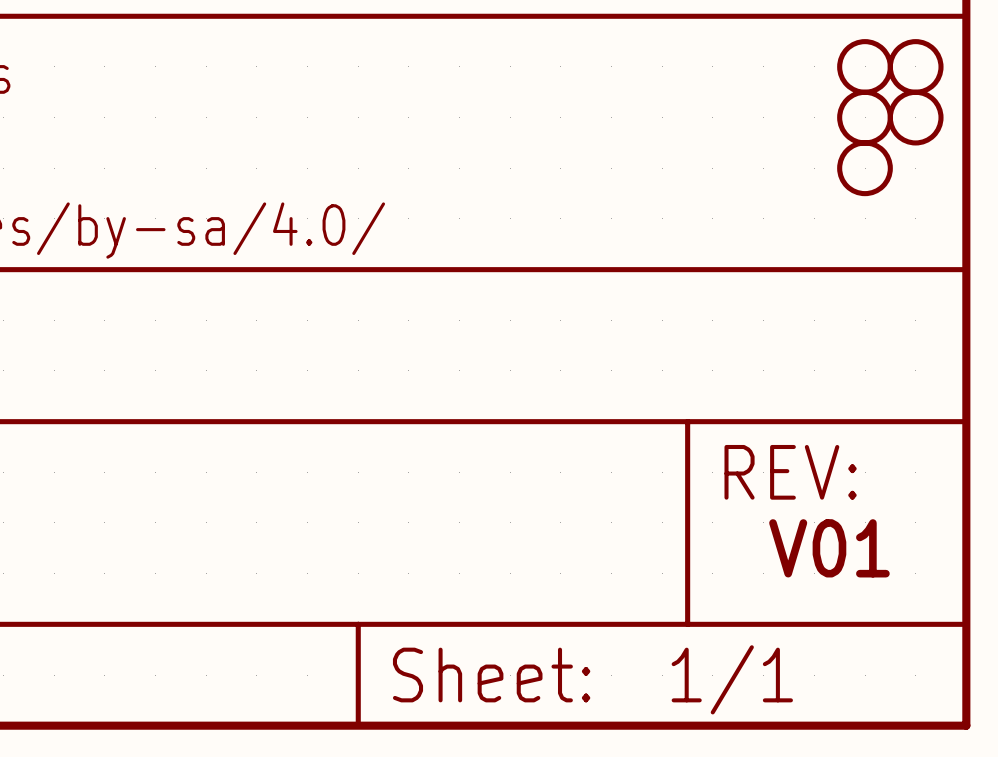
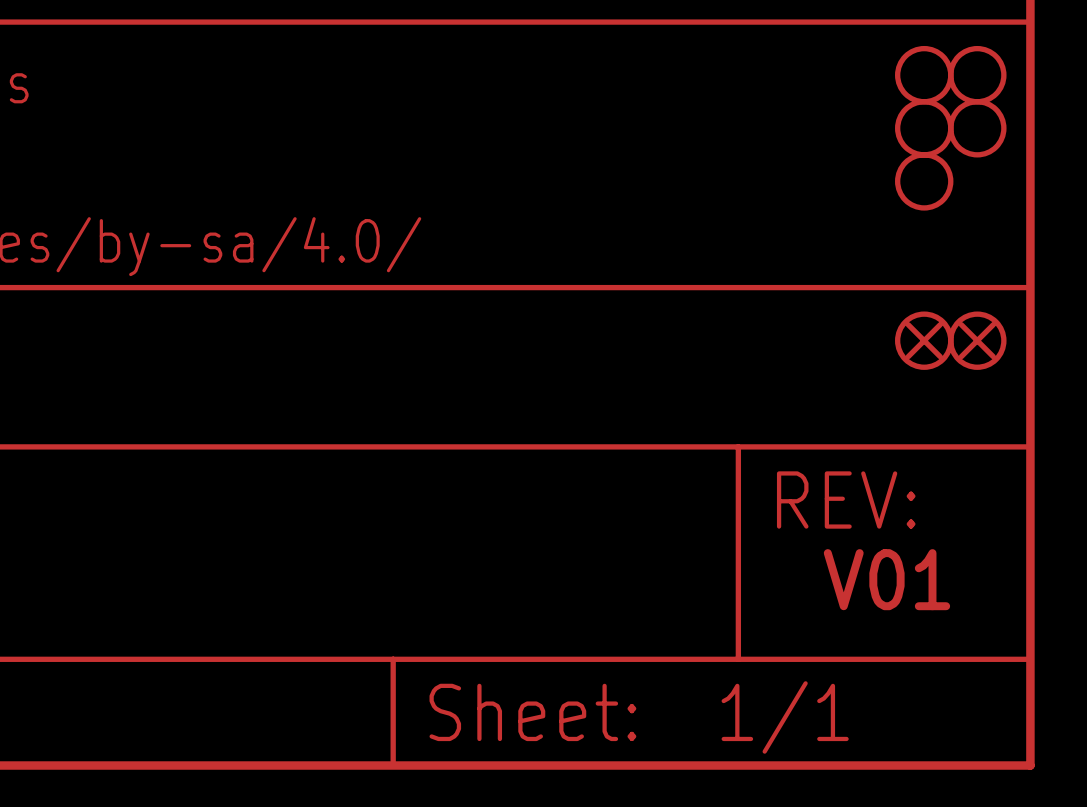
part: none -> (924, 340)
part: none -> (977, 340)

